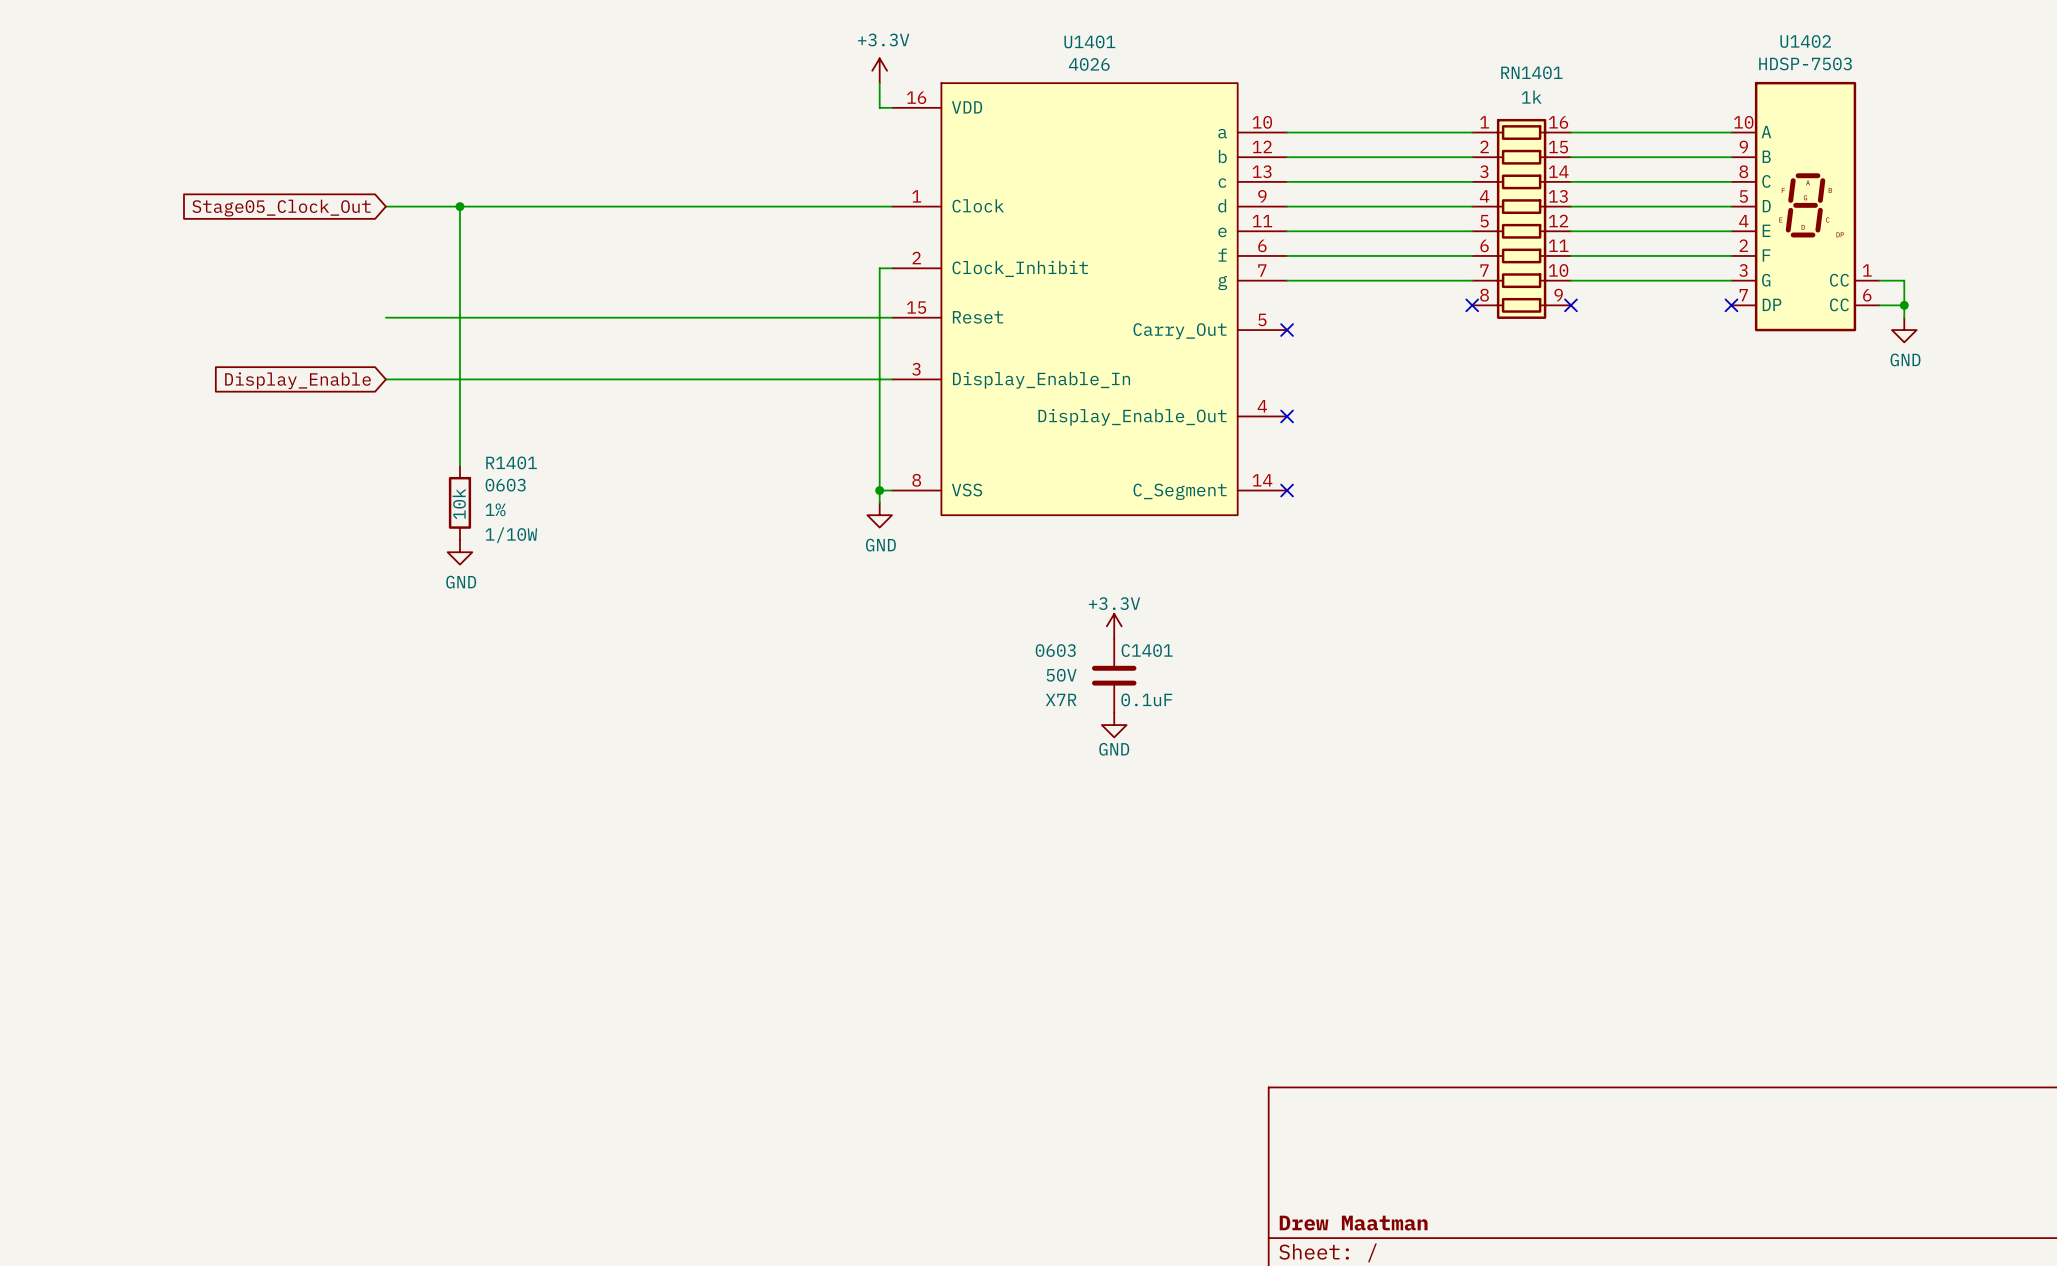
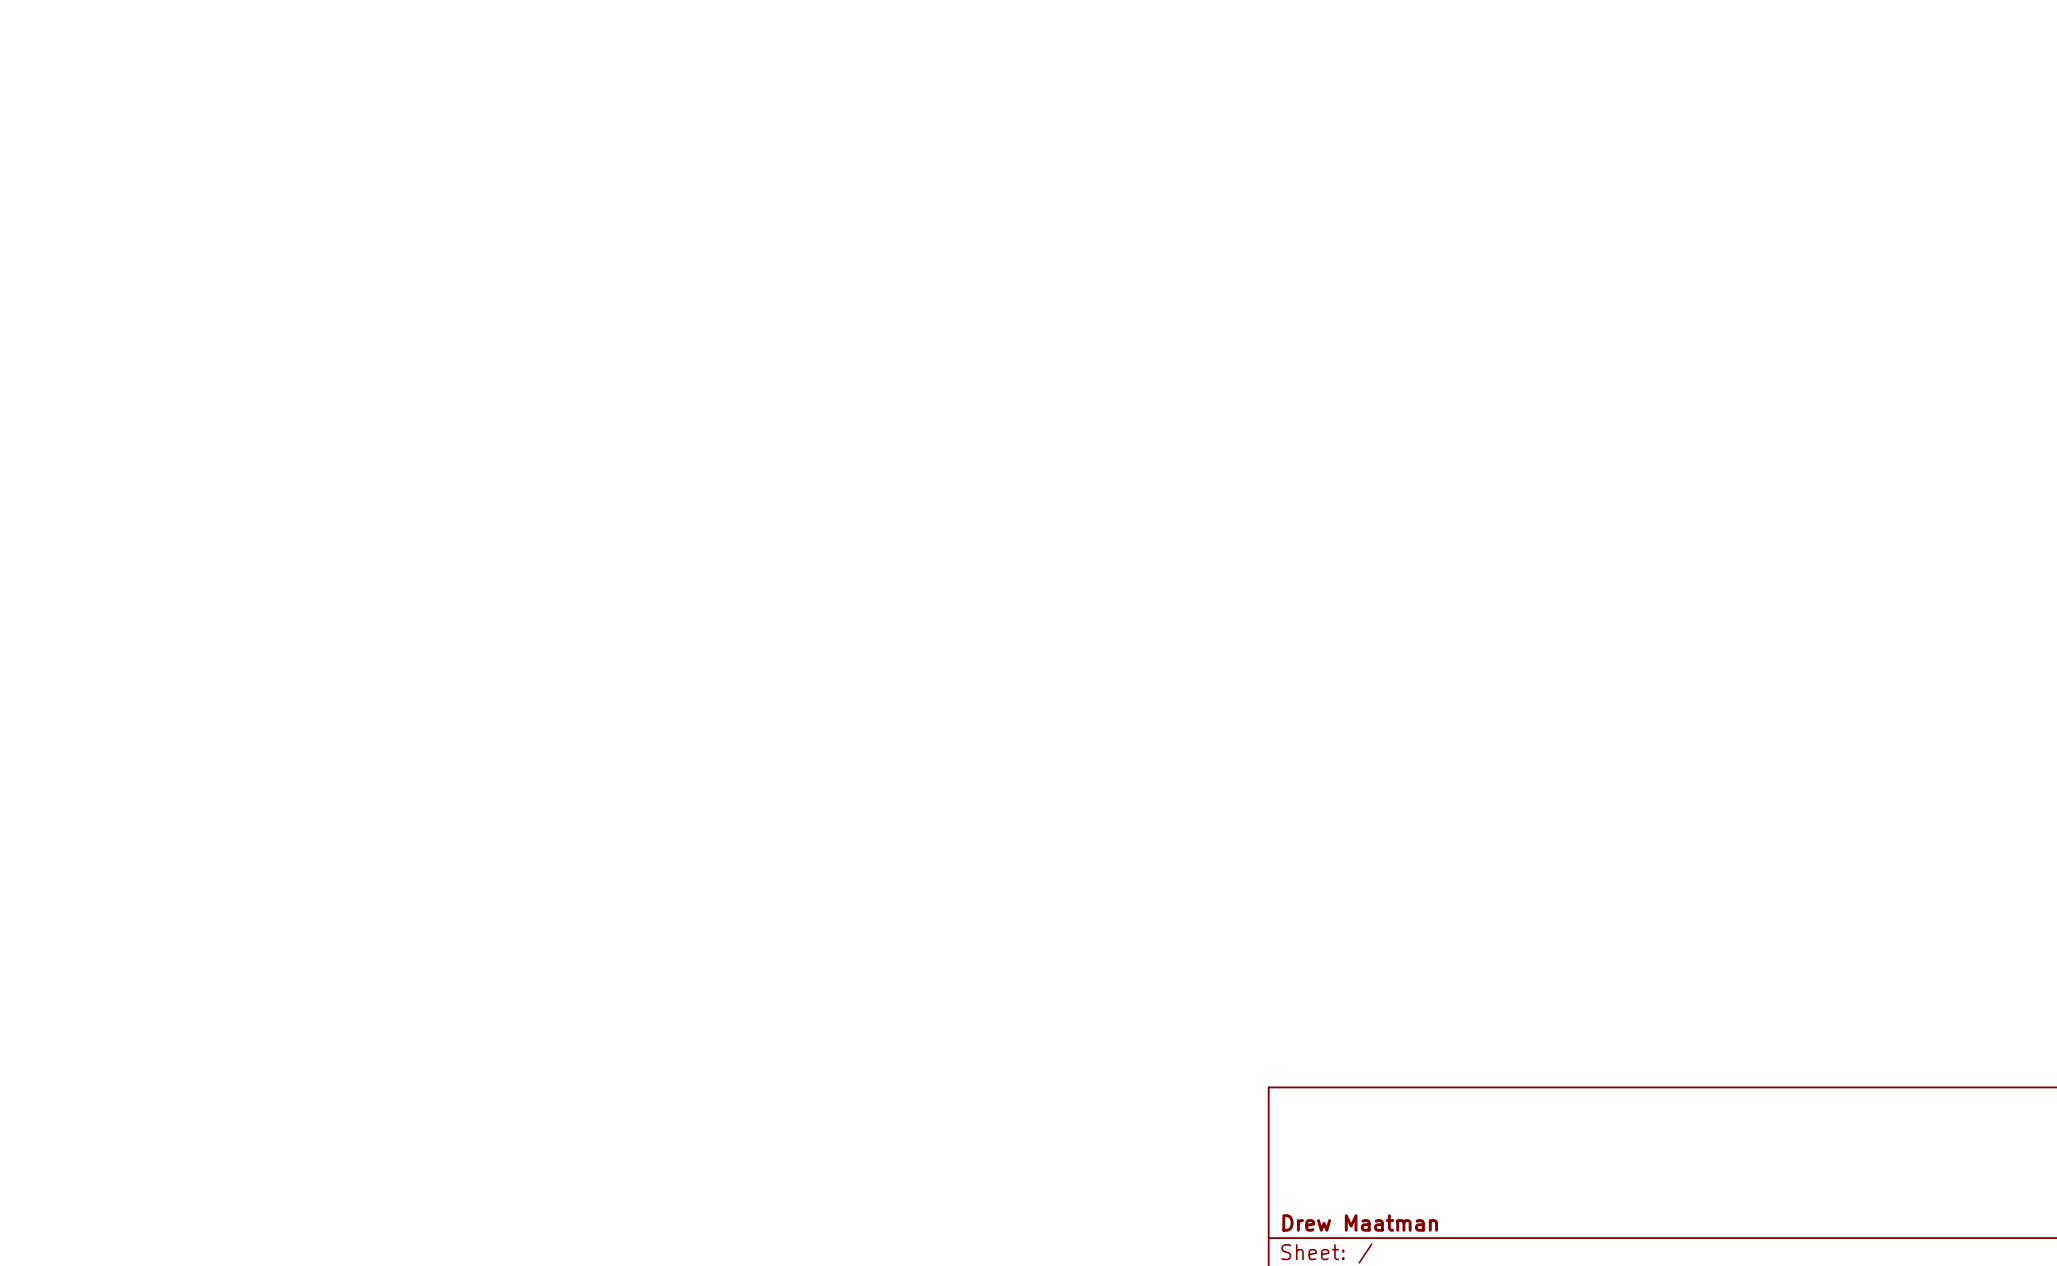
power symbol: +3.3V (879, 70) -> none
wire: (879, 83) (879, 107) (892, 107) -> none
wire: (1287, 132) (1472, 132) -> none
wire: (1570, 132) (1731, 132) -> none
wire: (1287, 157) (1472, 157) -> none
wire: (1570, 157) (1731, 157) -> none
wire: (1287, 181) (1472, 181) -> none
wire: (1570, 181) (1731, 181) -> none
wire: (385, 206) (892, 206) -> none
wire: (459, 206) (459, 465) -> none
junction: (459, 206) -> none
wire: (1287, 206) (1472, 206) -> none
wire: (1570, 206) (1731, 206) -> none
U1402: HDSP-7503 (1805, 206) -> none
global label: Stage05_Clock_Out (281, 208) -> none
RN1401: 1k (1521, 218) -> none
wire: (1287, 231) (1472, 231) -> none
wire: (1570, 231) (1731, 231) -> none
wire: (1287, 255) (1472, 255) -> none
wire: (1570, 255) (1731, 255) -> none
wire: (892, 268) (879, 268) (879, 502) -> none
wire: (1287, 280) (1472, 280) -> none
wire: (1570, 280) (1731, 280) -> none
wire: (1879, 280) (1904, 280) (1904, 317) -> none
U1401: 4026 (1089, 299) -> none
no-connect mark: (1472, 305) -> none
no-connect mark: (1570, 305) -> none
no-connect mark: (1731, 305) -> none
wire: (1879, 305) (1904, 305) -> none
junction: (1904, 305) -> none
wire: (385, 317) (892, 317) -> none
no-connect mark: (1287, 330) -> none
power symbol: GND (1904, 330) -> none
wire: (385, 379) (892, 379) -> none
global label: Display_Enable (297, 380) -> none
no-connect mark: (1287, 416) -> none
wire: (879, 490) (892, 490) -> none
junction: (879, 490) -> none
no-connect mark: (1287, 490) -> none
R1401: 10k (459, 502) -> none
power symbol: GND (879, 515) -> none
power symbol: GND (459, 552) -> none
power symbol: +3.3V (1114, 626) -> none
C1401: 0.1uF (1114, 675) -> none
power symbol: GND (1114, 725) -> none

